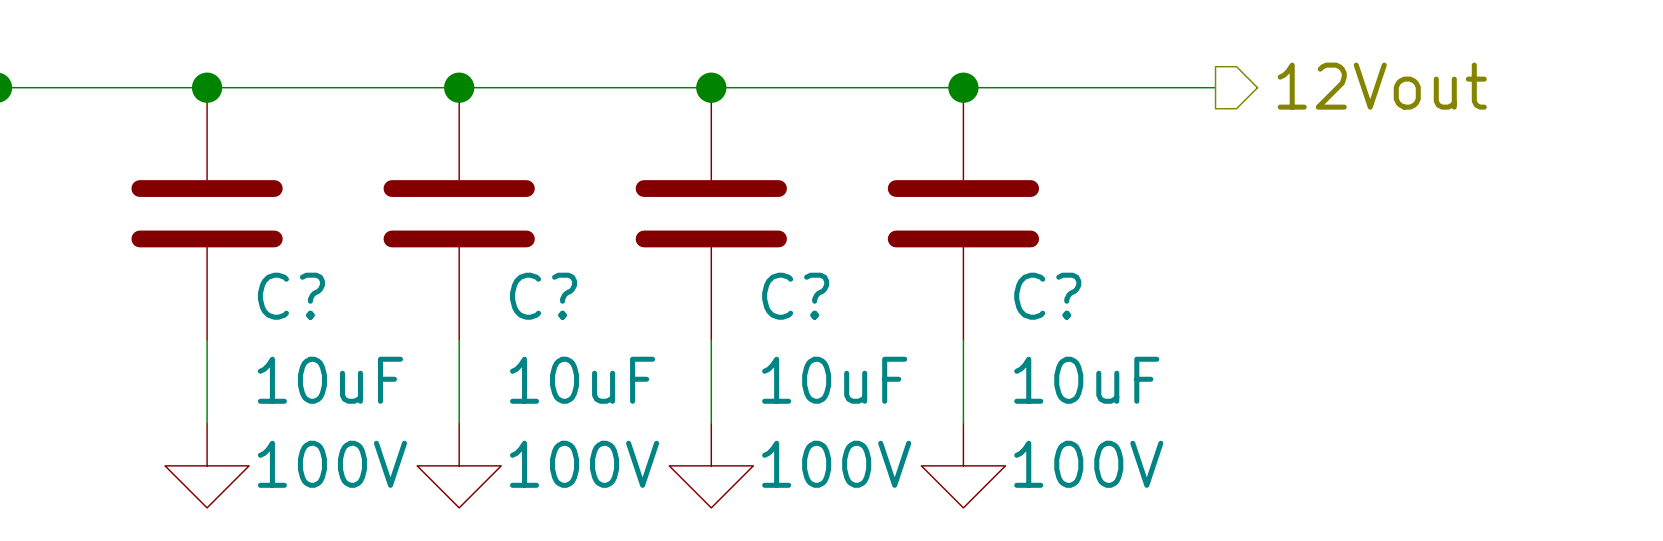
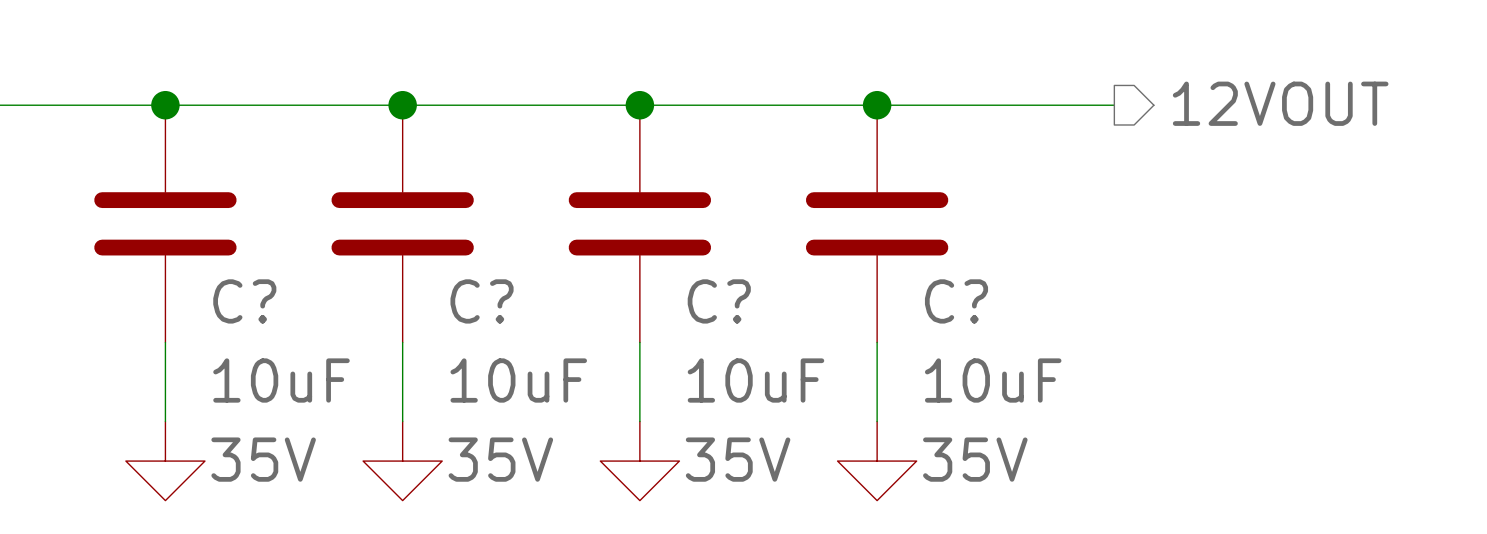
hierarchical label: 12Vout (1382, 86) -> 12VOUT (1280, 103)
C? text: 100V (332, 464) -> 35V (263, 459)
C? text: 100V (584, 464) -> 35V (500, 459)
C? text: 100V (836, 464) -> 35V (738, 459)
C? text: 100V (1088, 464) -> 35V (975, 459)

